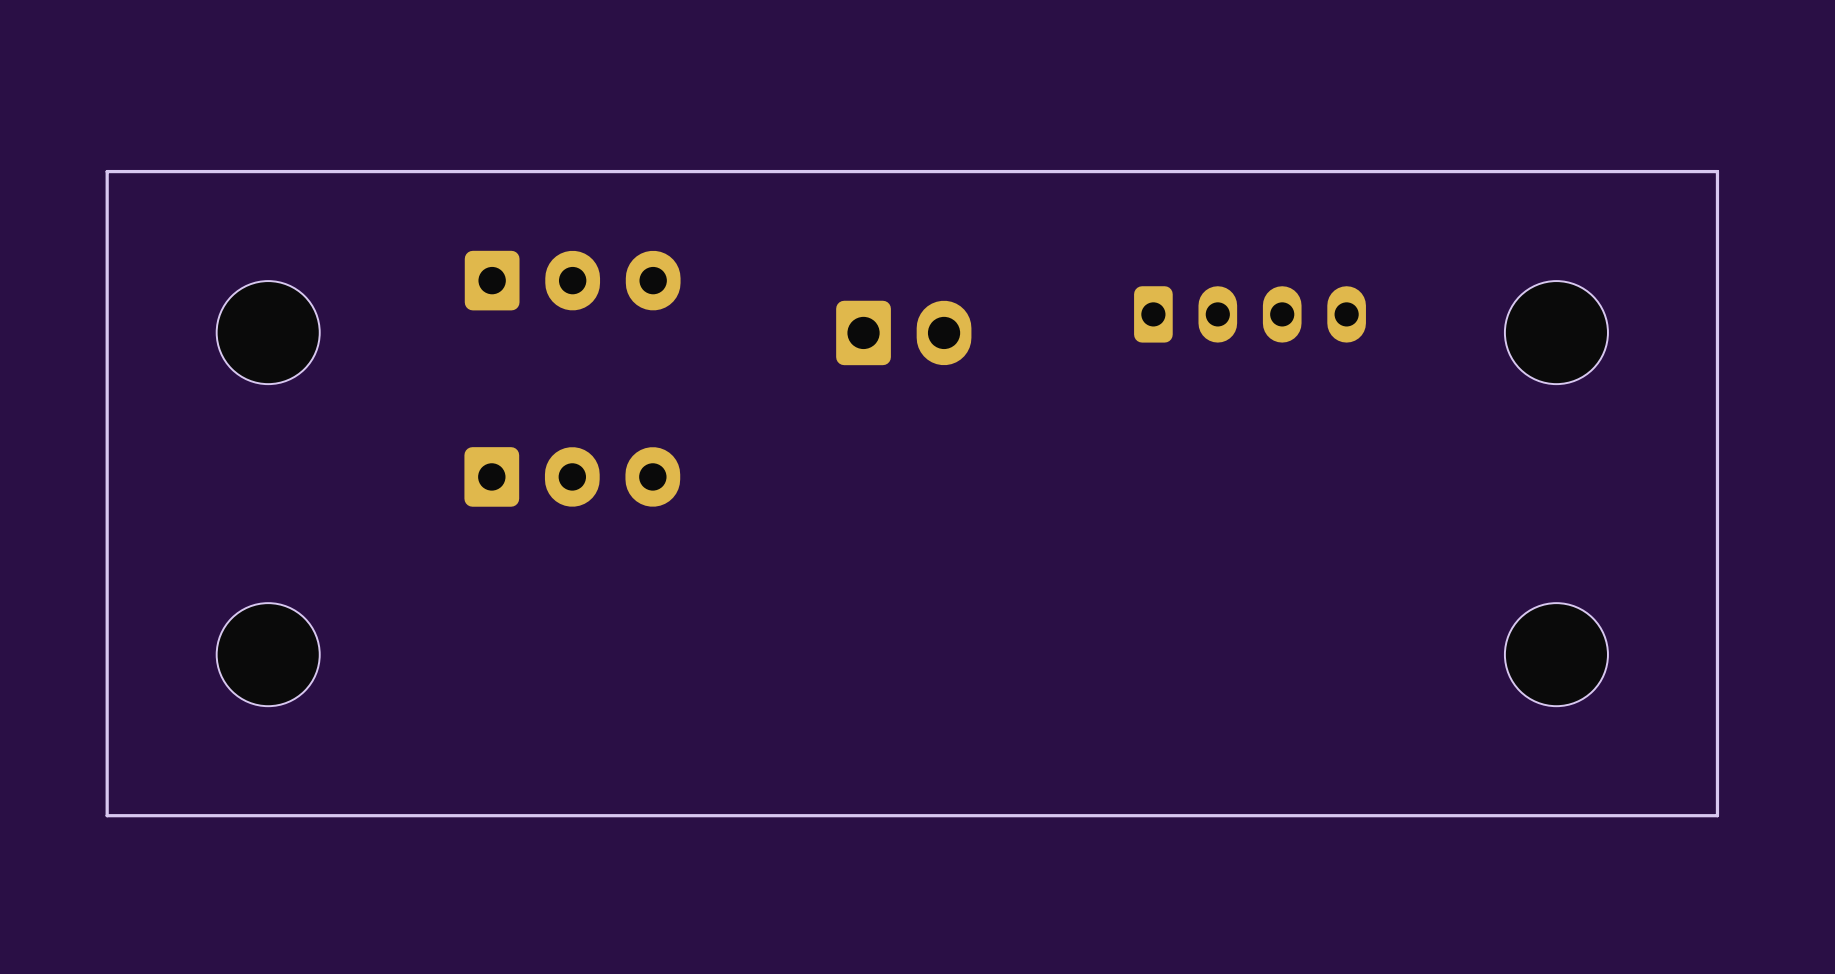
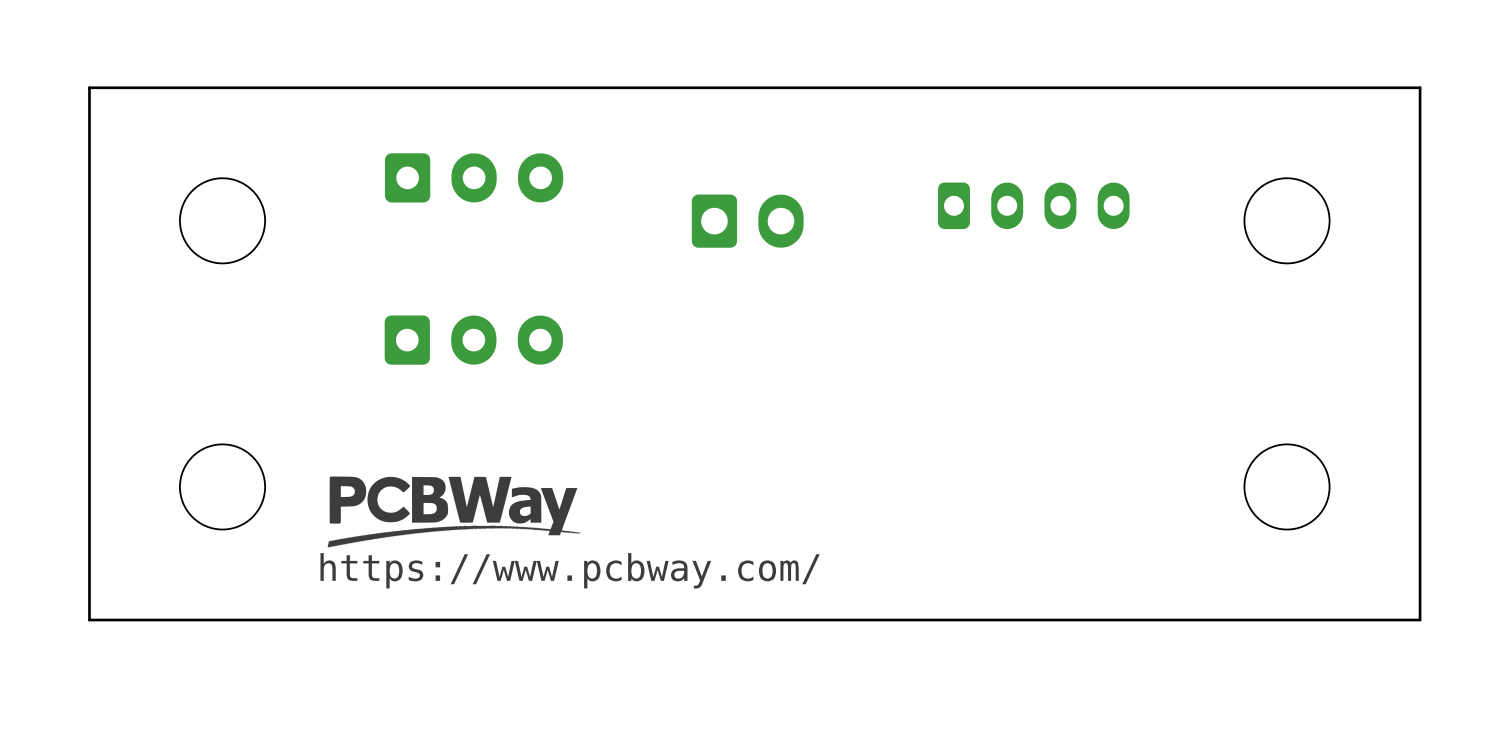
drawing: none -> [327, 476, 581, 548]
text: none -> https://www.pcbway.com/ (570, 570)

